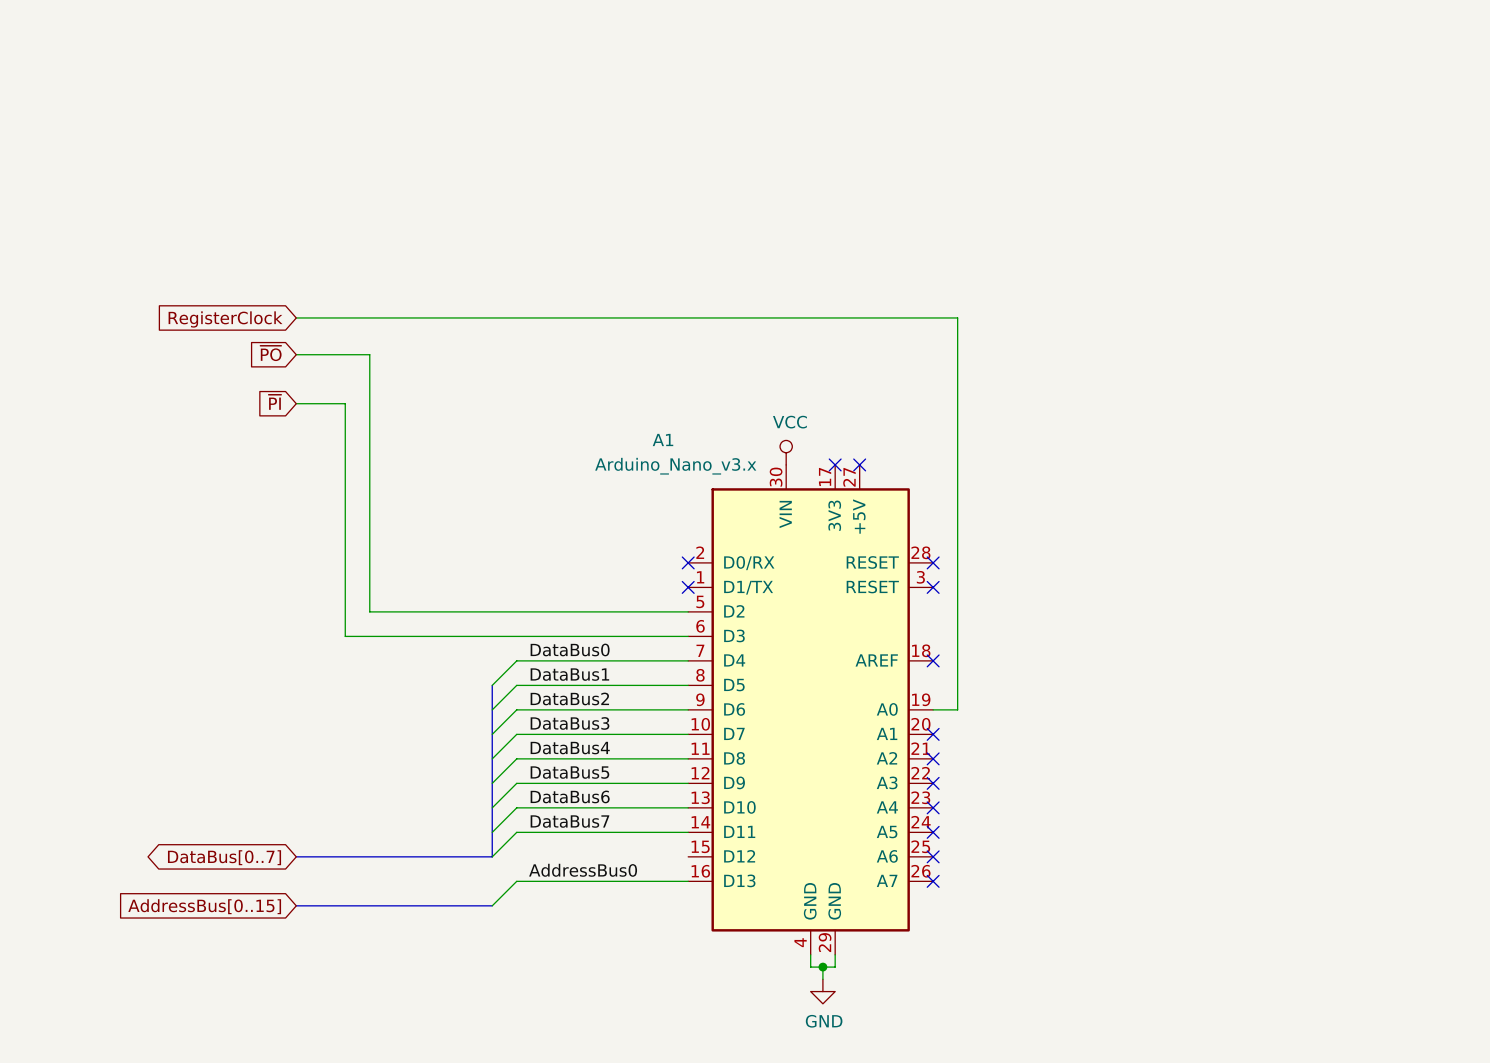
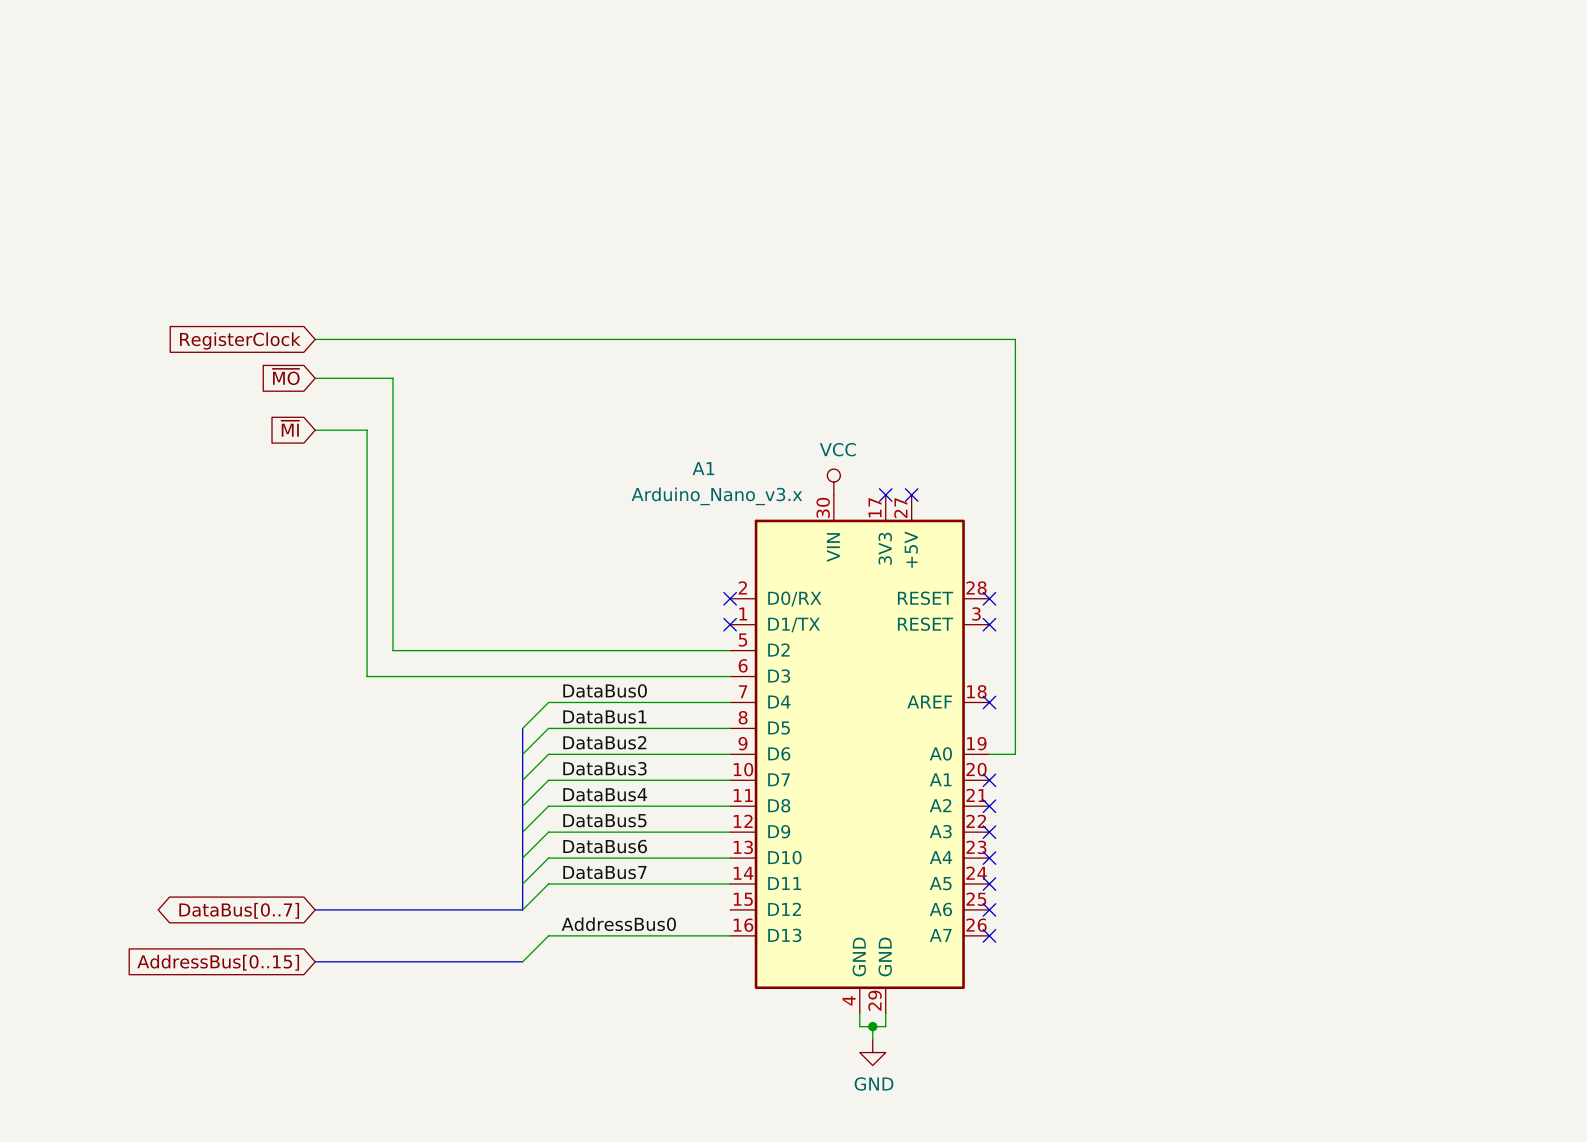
global label: ~{PO} (270, 353) -> ~{MO} (286, 376)
global label: ~{PI} (274, 402) -> ~{MI} (290, 428)

